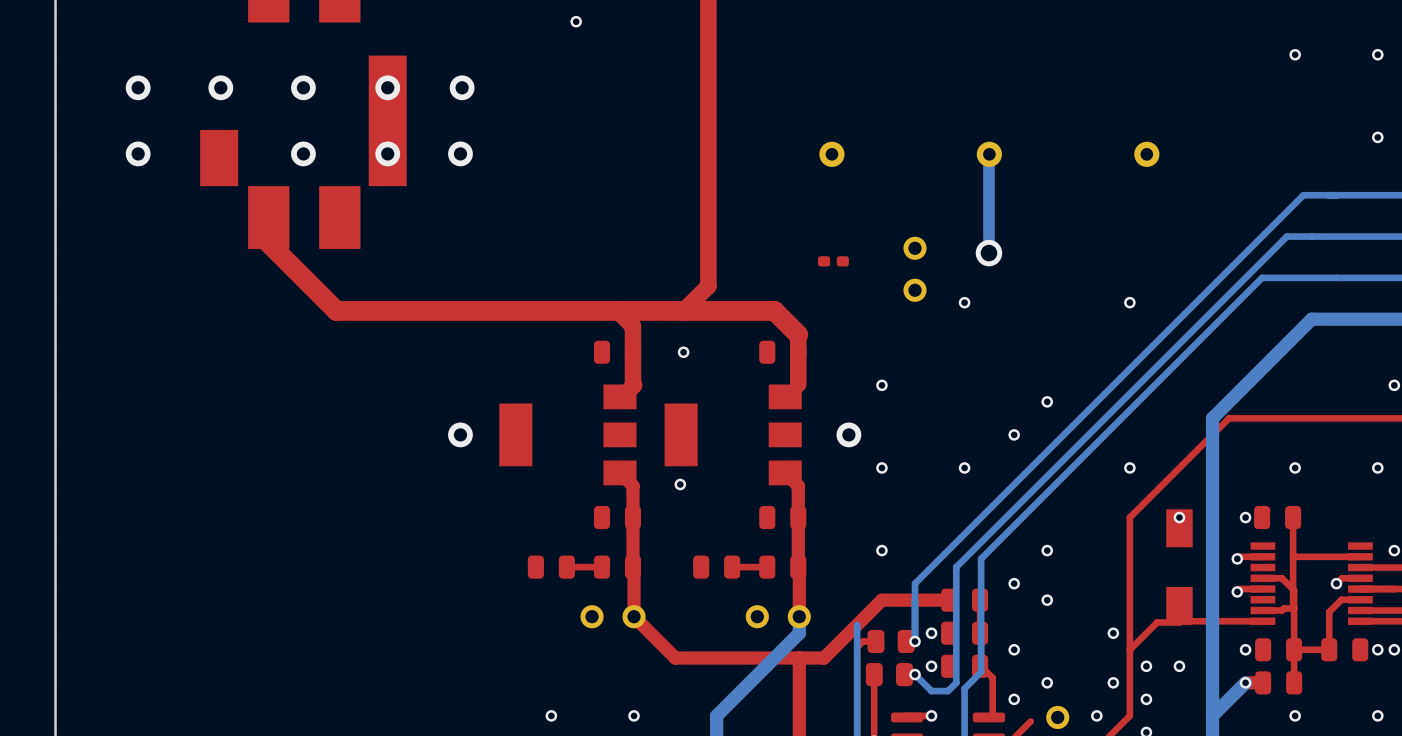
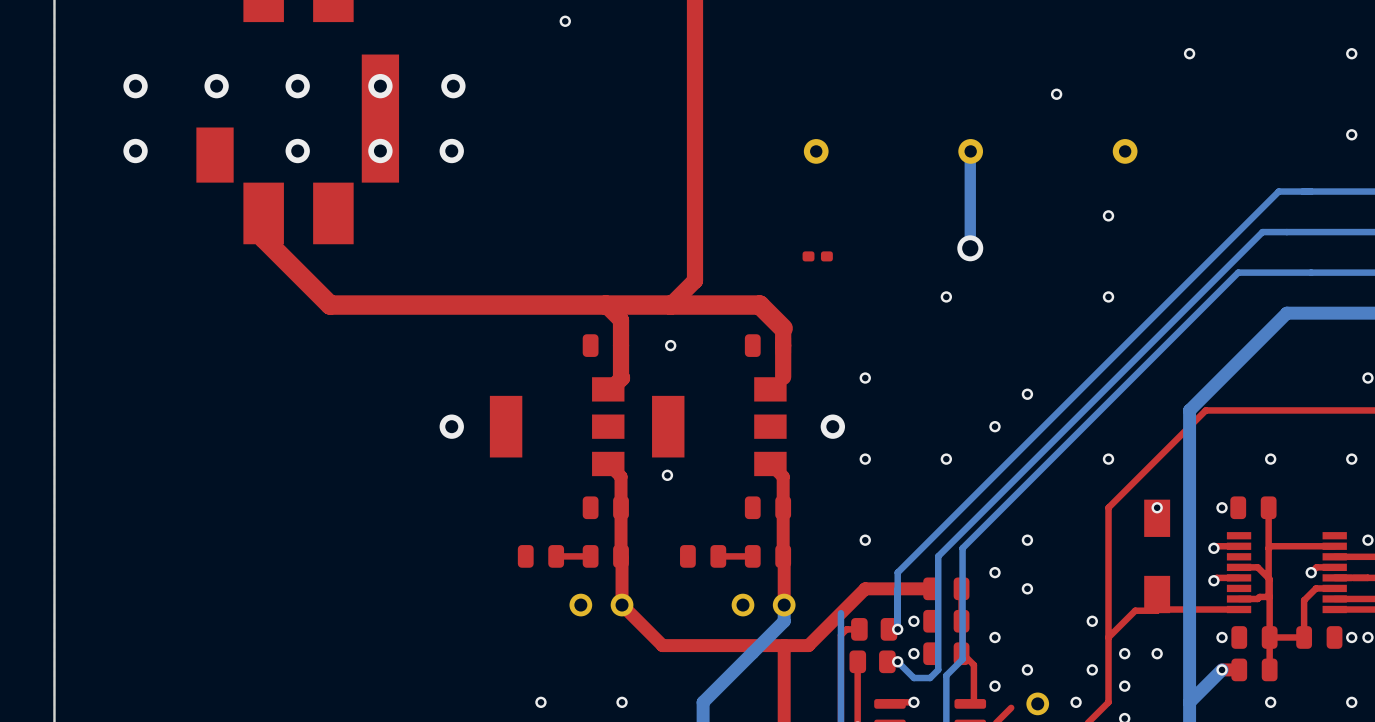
via position: (1295, 54) -> (1189, 53)
via: none -> (1056, 94)
via: none -> (1108, 215)
part: (915, 269) -> none

